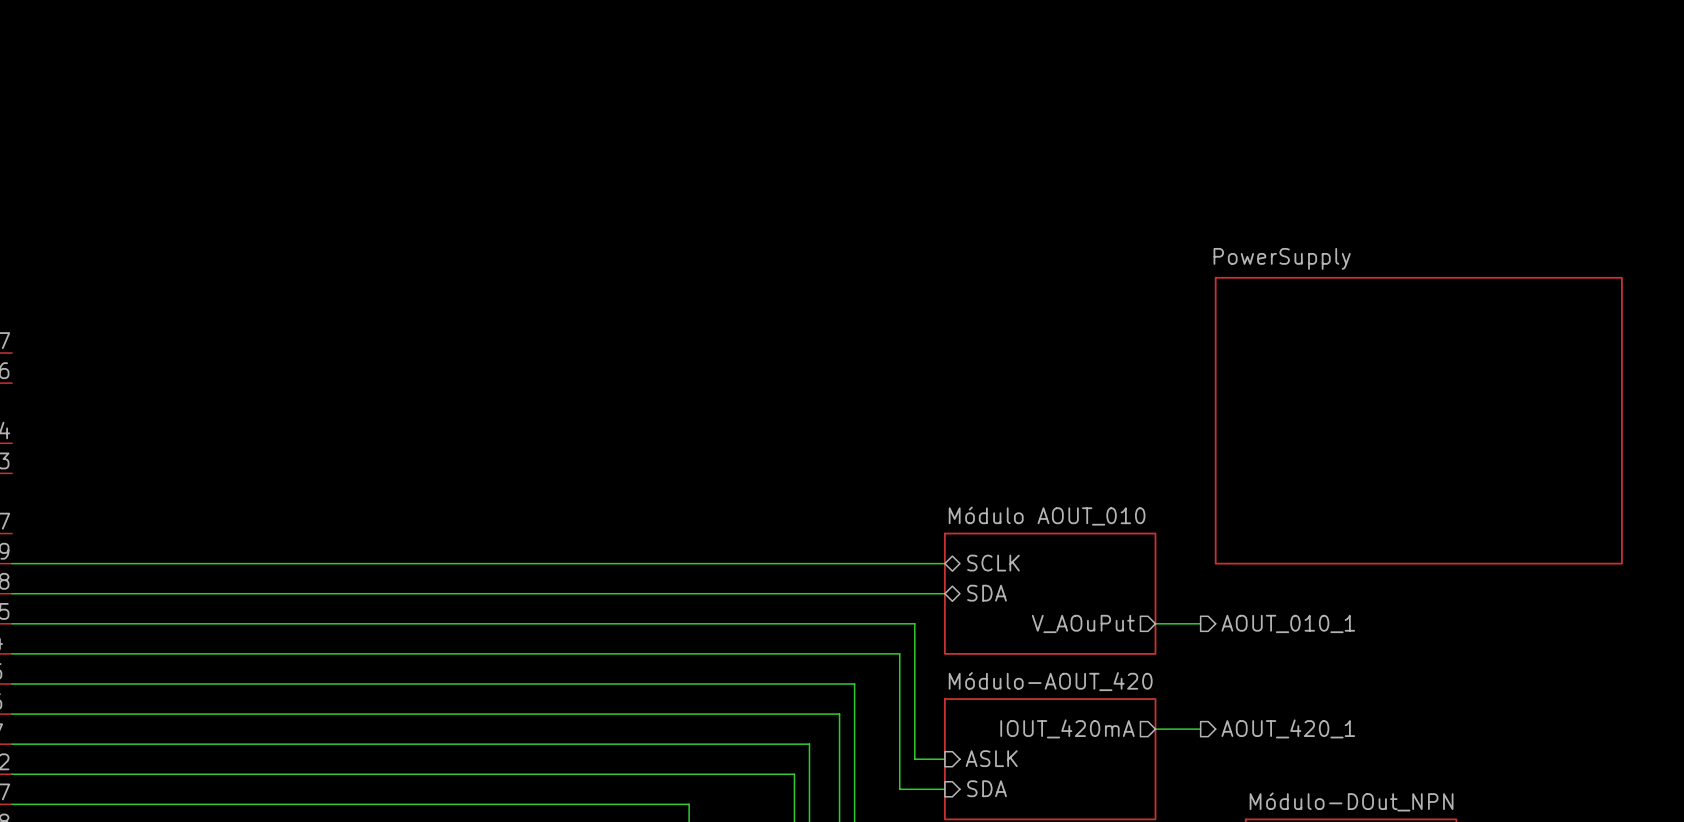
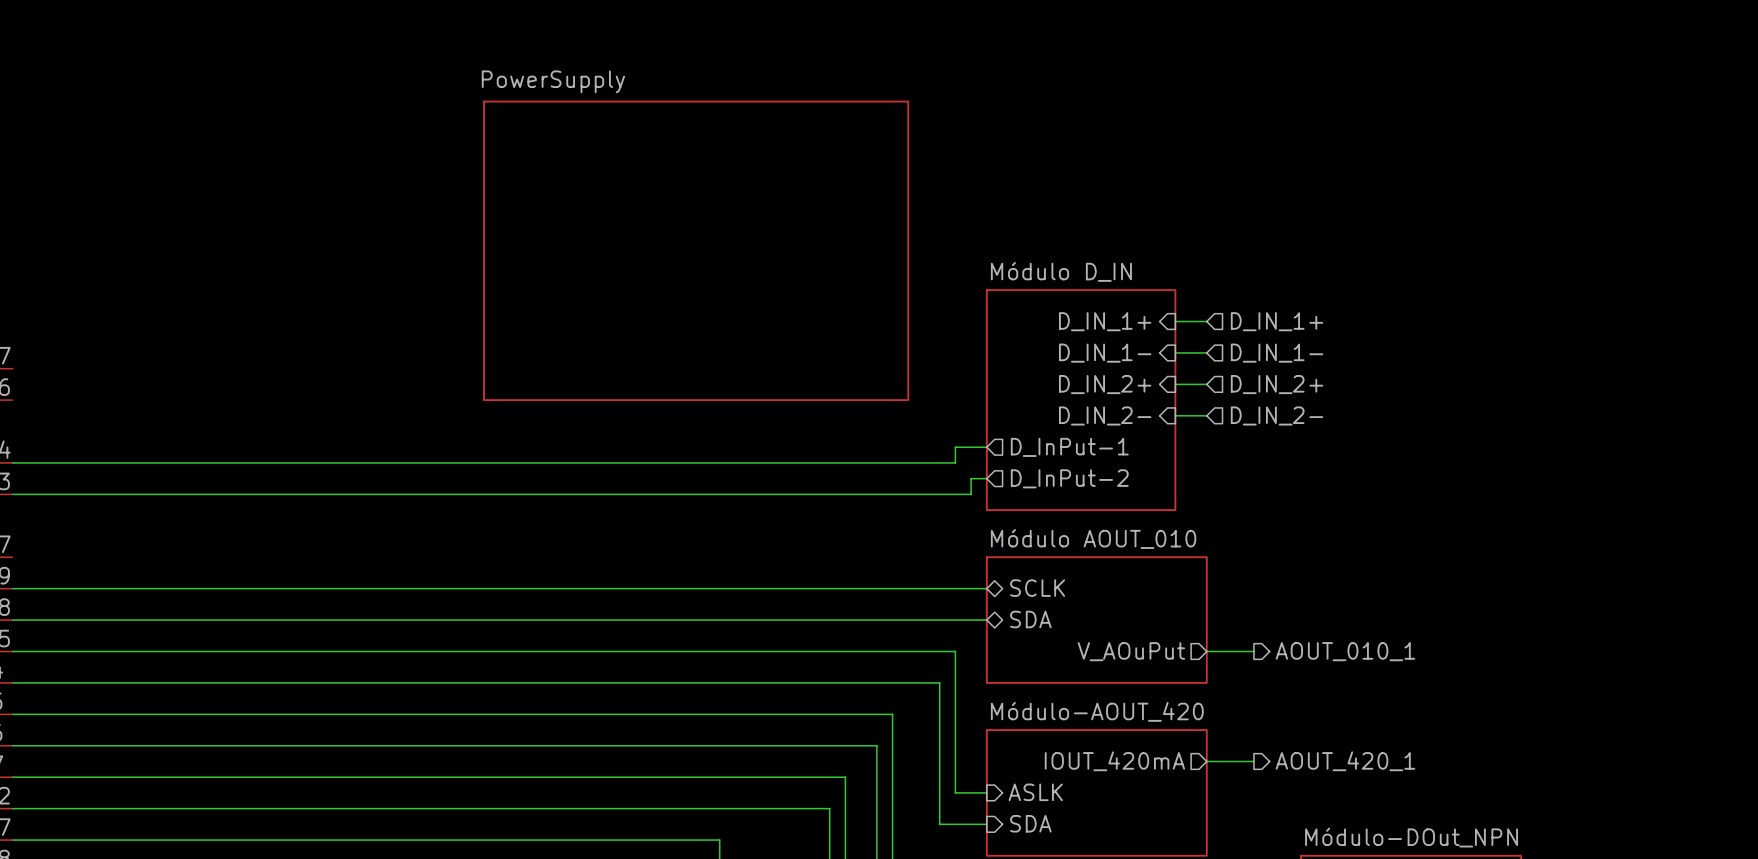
sheet PowerSupply: none -> (696, 250)
wire: none -> (1175, 321) (1206, 321)
sheet pin: none -> D_IN_1+ (1105, 321)
hierarchical label: none -> D_IN_1+ (1277, 321)
wire: none -> (1175, 352) (1206, 352)
sheet pin: none -> D_IN_1- (1105, 353)
hierarchical label: none -> D_IN_1- (1277, 353)
sheet pin: none -> D_IN_2+ (1105, 384)
wire: none -> (1175, 384) (1206, 384)
hierarchical label: none -> D_IN_2+ (1277, 384)
sheet Módulo D_IN: none -> (1081, 400)
sheet pin: none -> D_IN_2- (1105, 415)
wire: none -> (1175, 415) (1206, 415)
hierarchical label: none -> D_IN_2- (1277, 415)
sheet PowerSupply: (1418, 420) -> none
wire: none -> (986, 447) (955, 447) (955, 462) (12, 462)
sheet pin: none -> D_InPut-1 (1069, 447)
wire: none -> (986, 478) (971, 478) (971, 494) (12, 494)
sheet pin: none -> D_InPut-2 (1069, 478)

